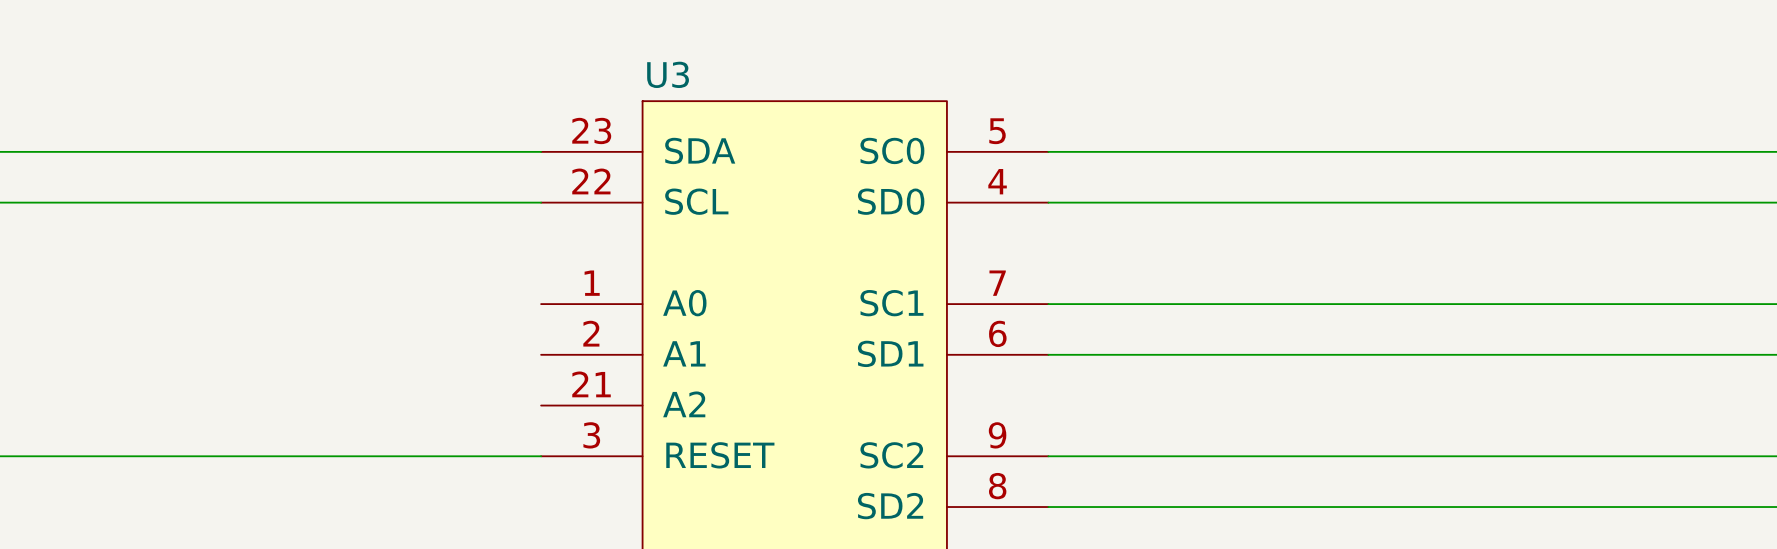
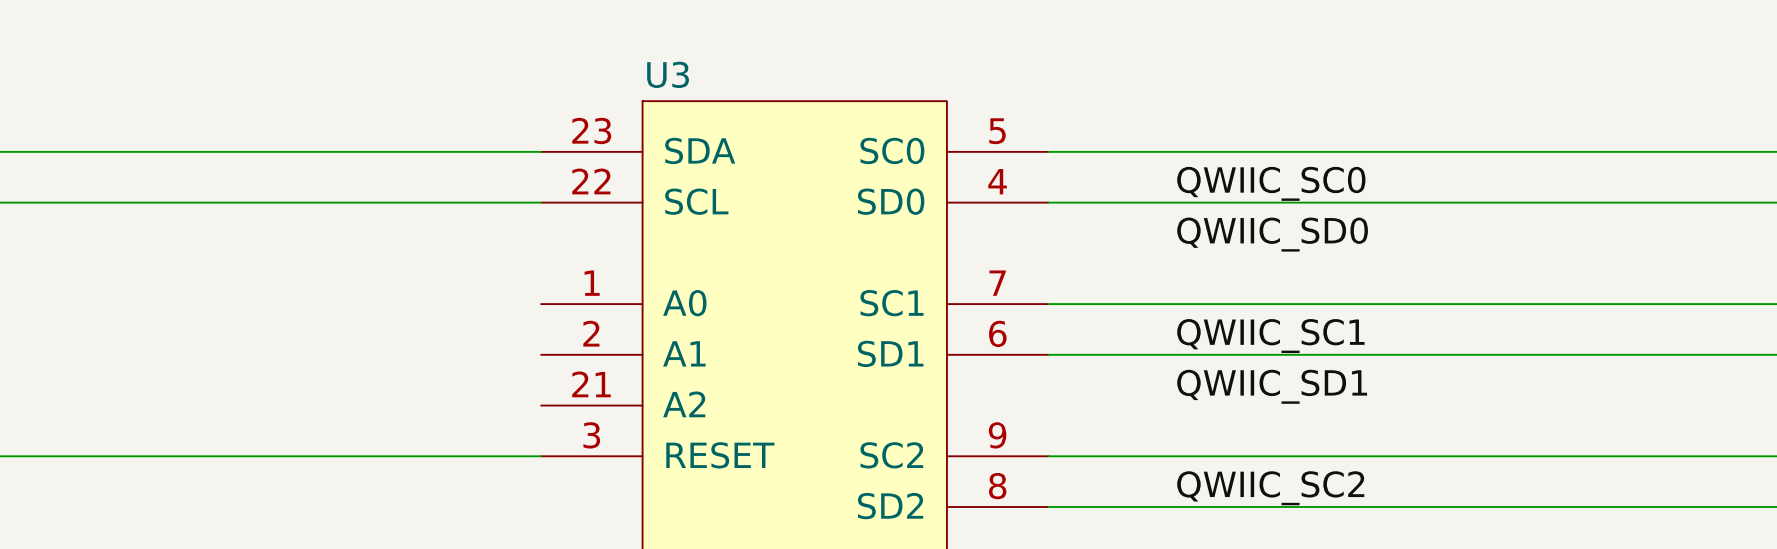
label: none -> QWIIC_SC0 (1271, 183)
label: none -> QWIIC_SD0 (1272, 234)
label: none -> QWIIC_SC1 (1270, 336)
label: none -> QWIIC_SD1 (1272, 386)
label: none -> QWIIC_SC2 (1270, 488)

